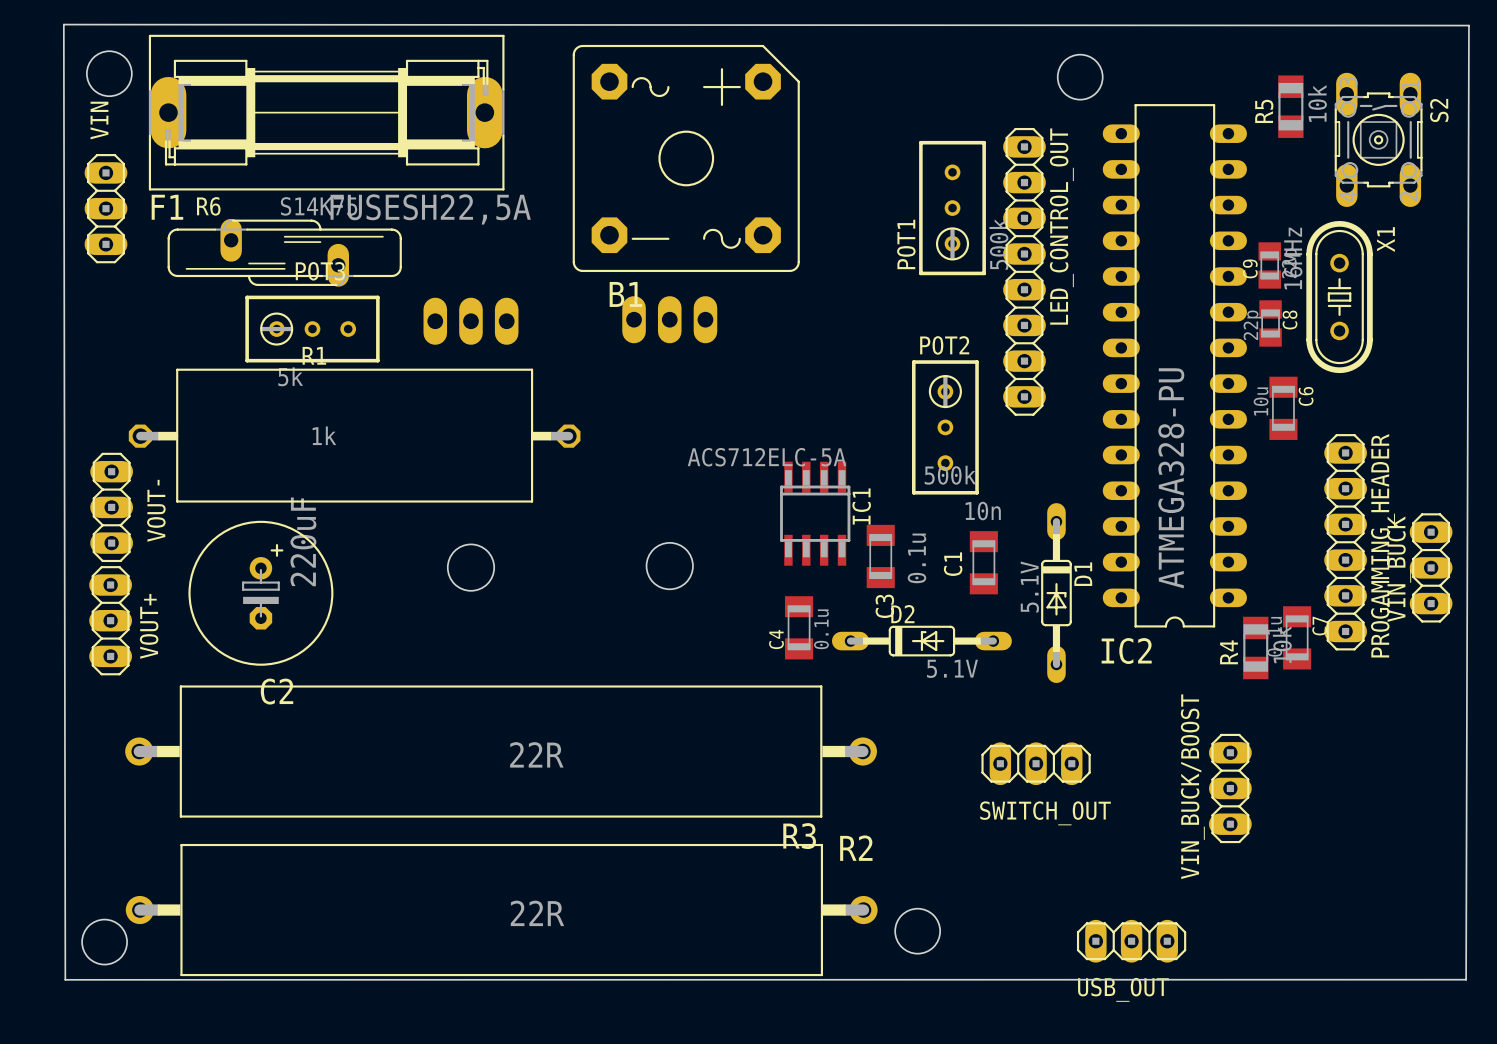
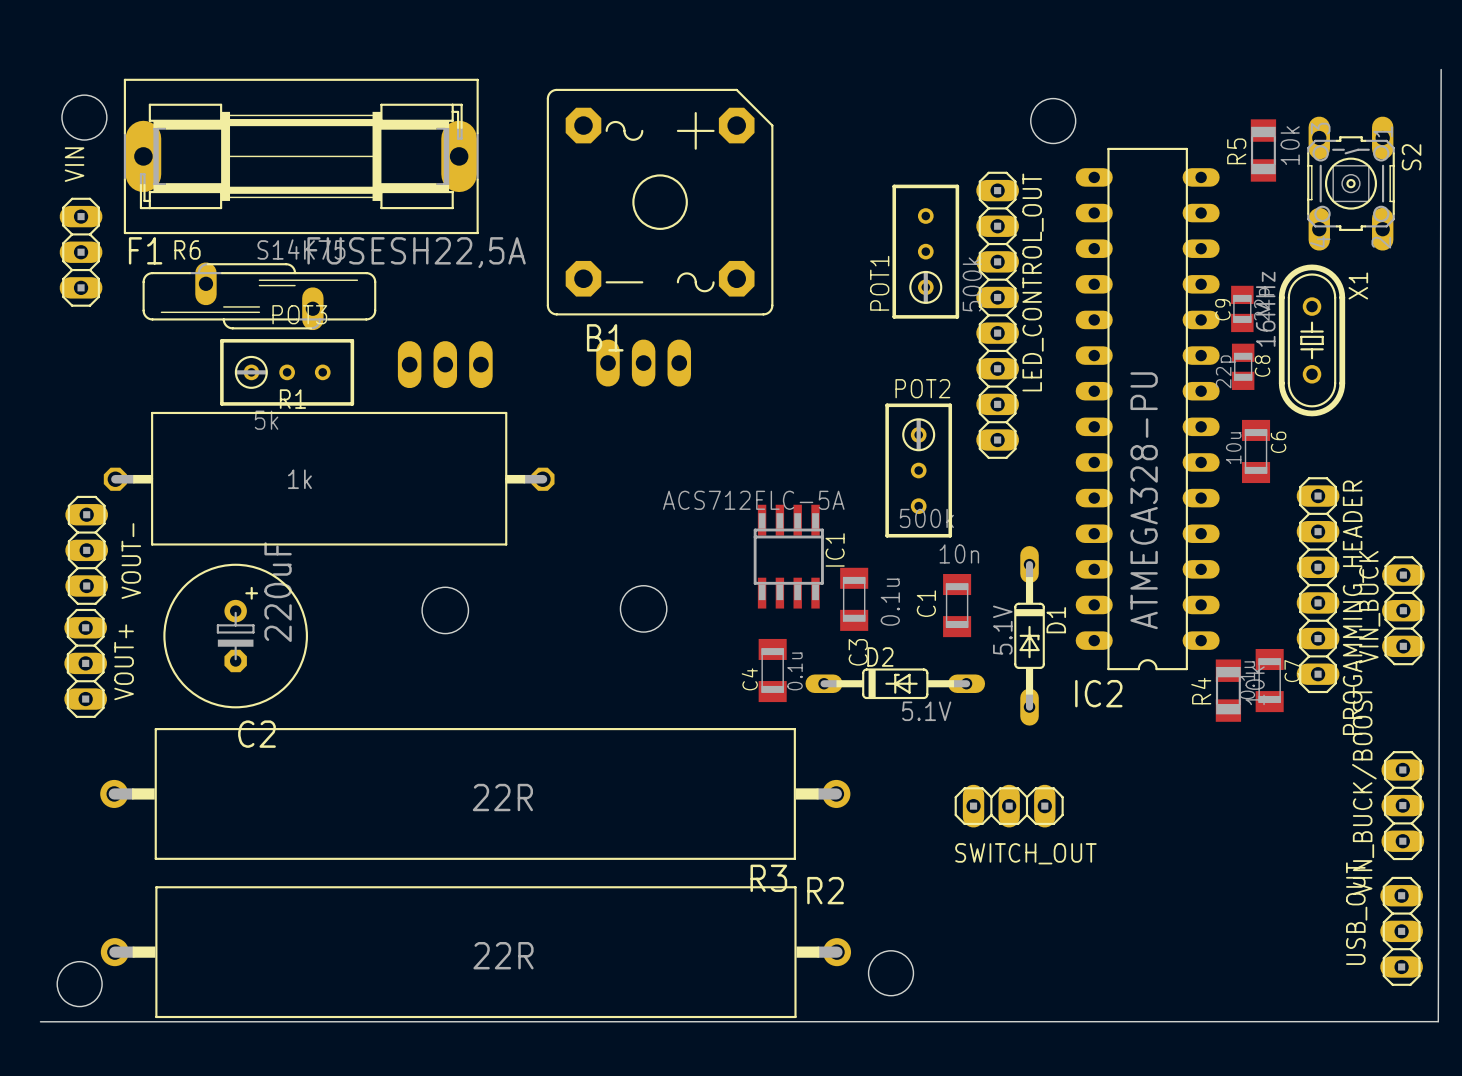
board edge: (1468, 25) (63, 24) (65, 979) -> none
VIN_BUCK/BOOST position: (1230, 788) -> (1402, 805)
USB_OUT rotation: 0° (1131, 941) -> 90° clockwise (1401, 931)
USB_OUT position: (1131, 941) -> (1401, 931)

